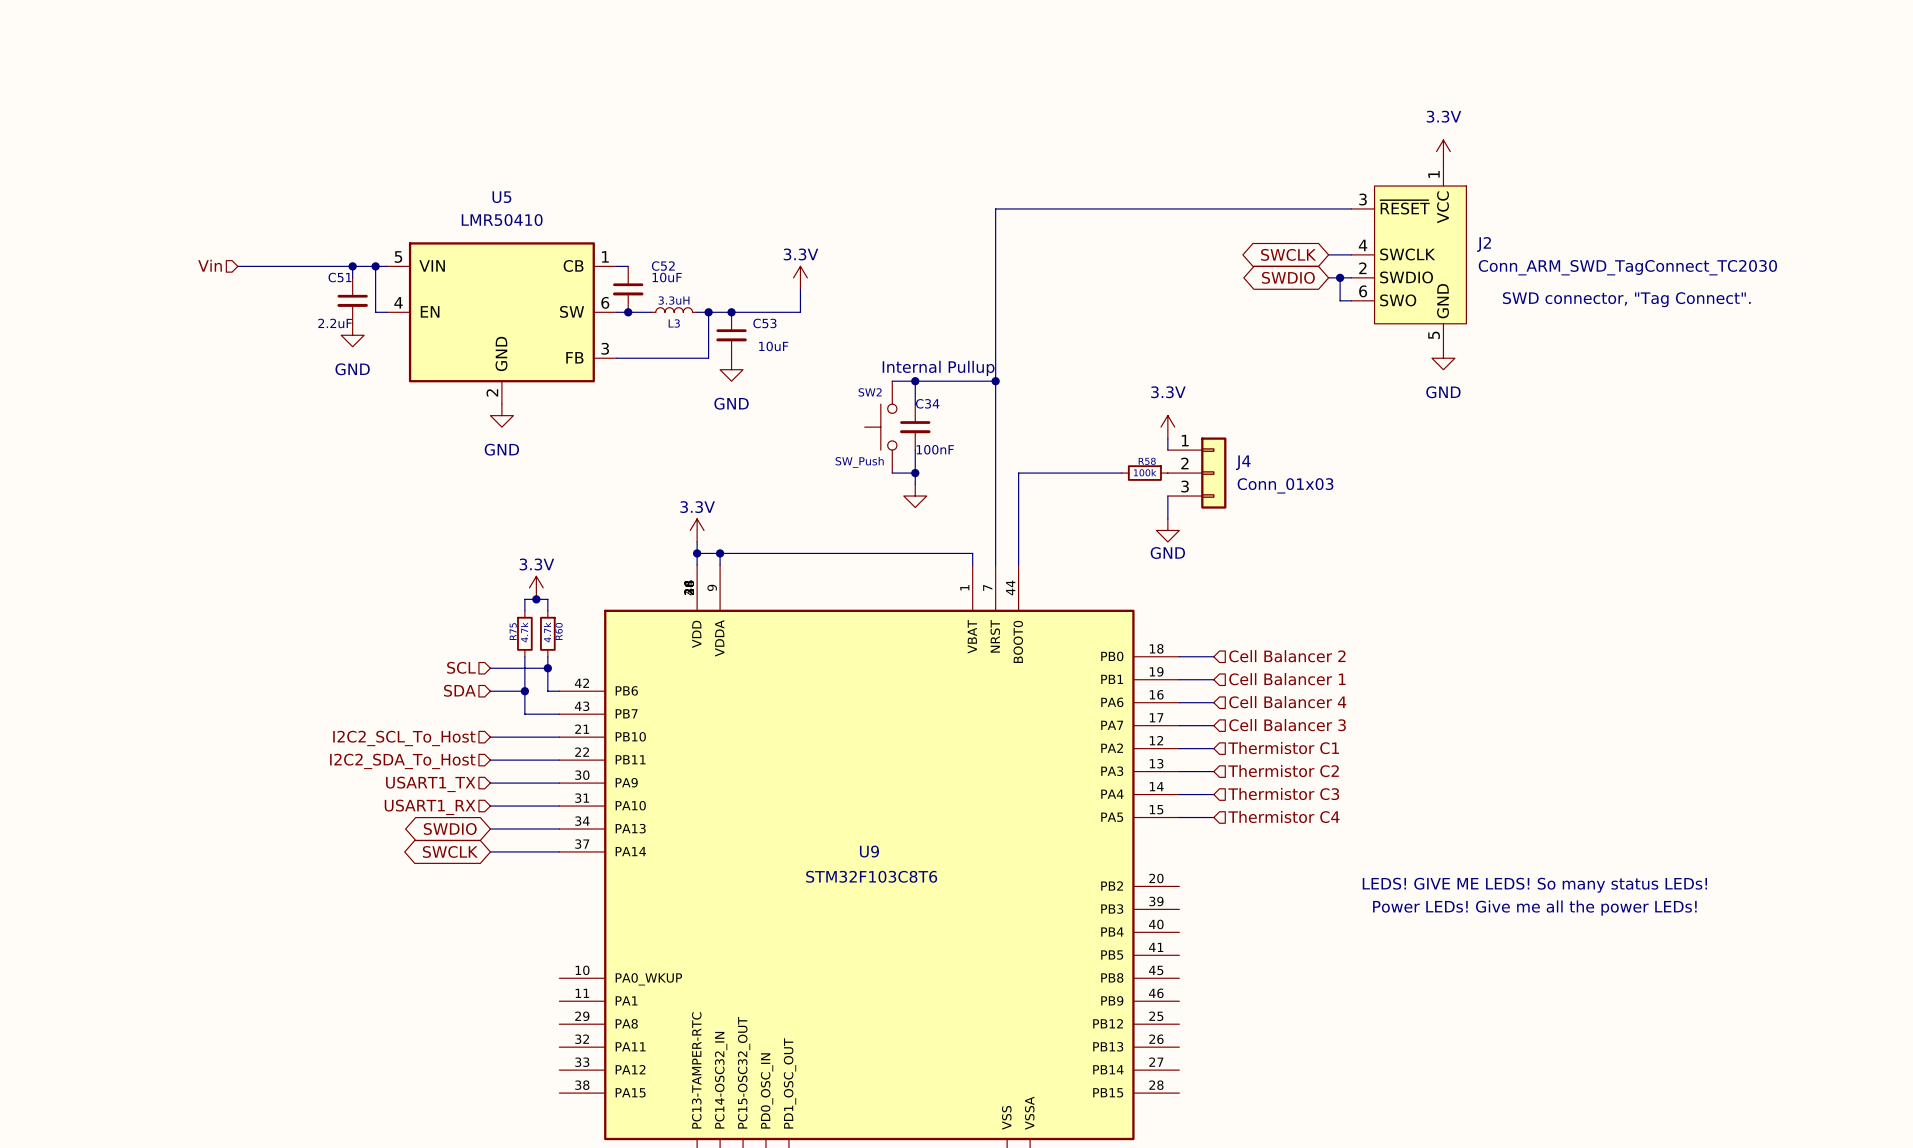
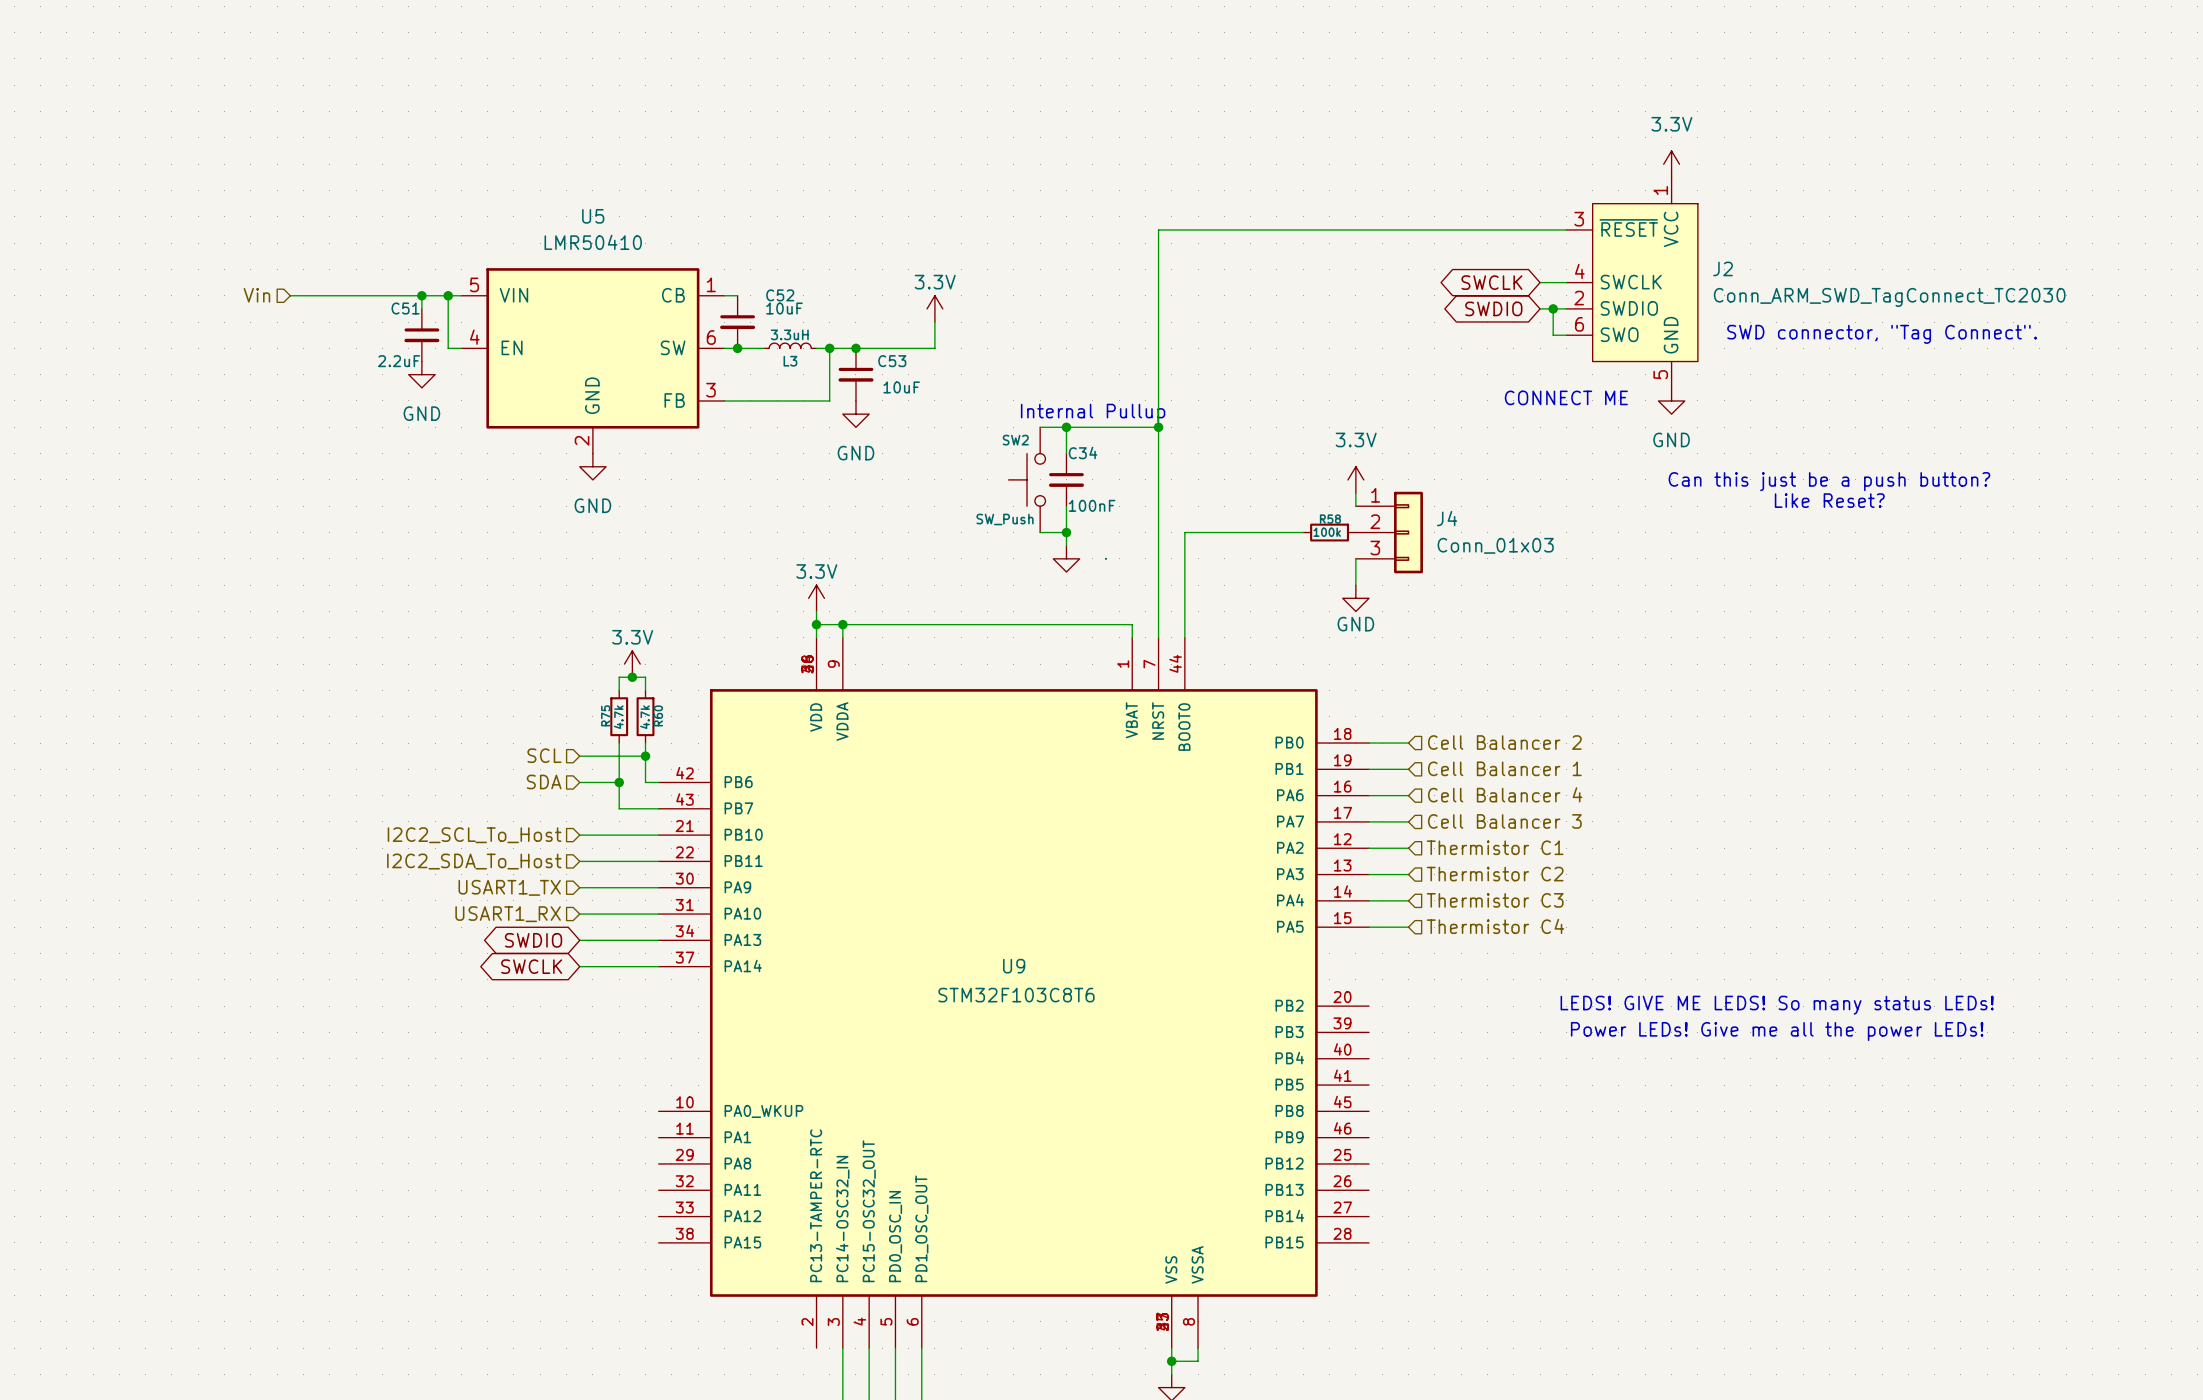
text: none -> CONNECT ME (1566, 397)
text: none -> Can this just be a push button? (1829, 481)
text: none -> Like Reset? (1829, 500)

